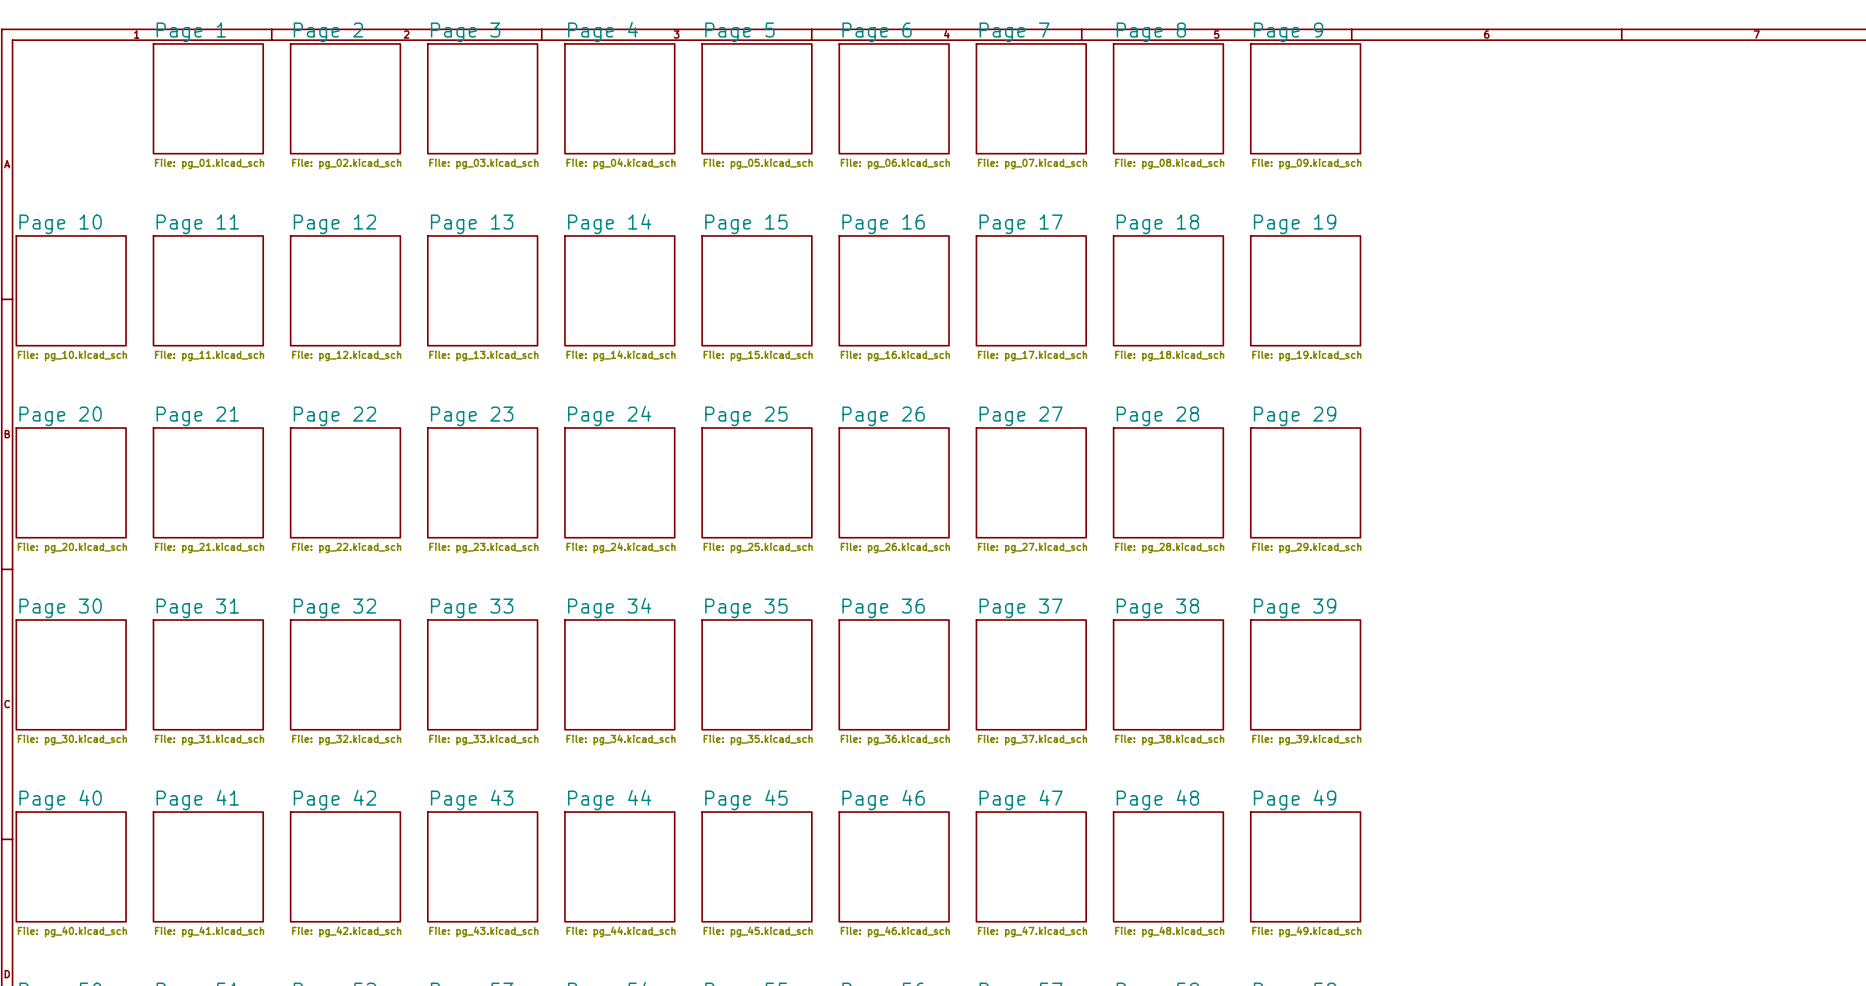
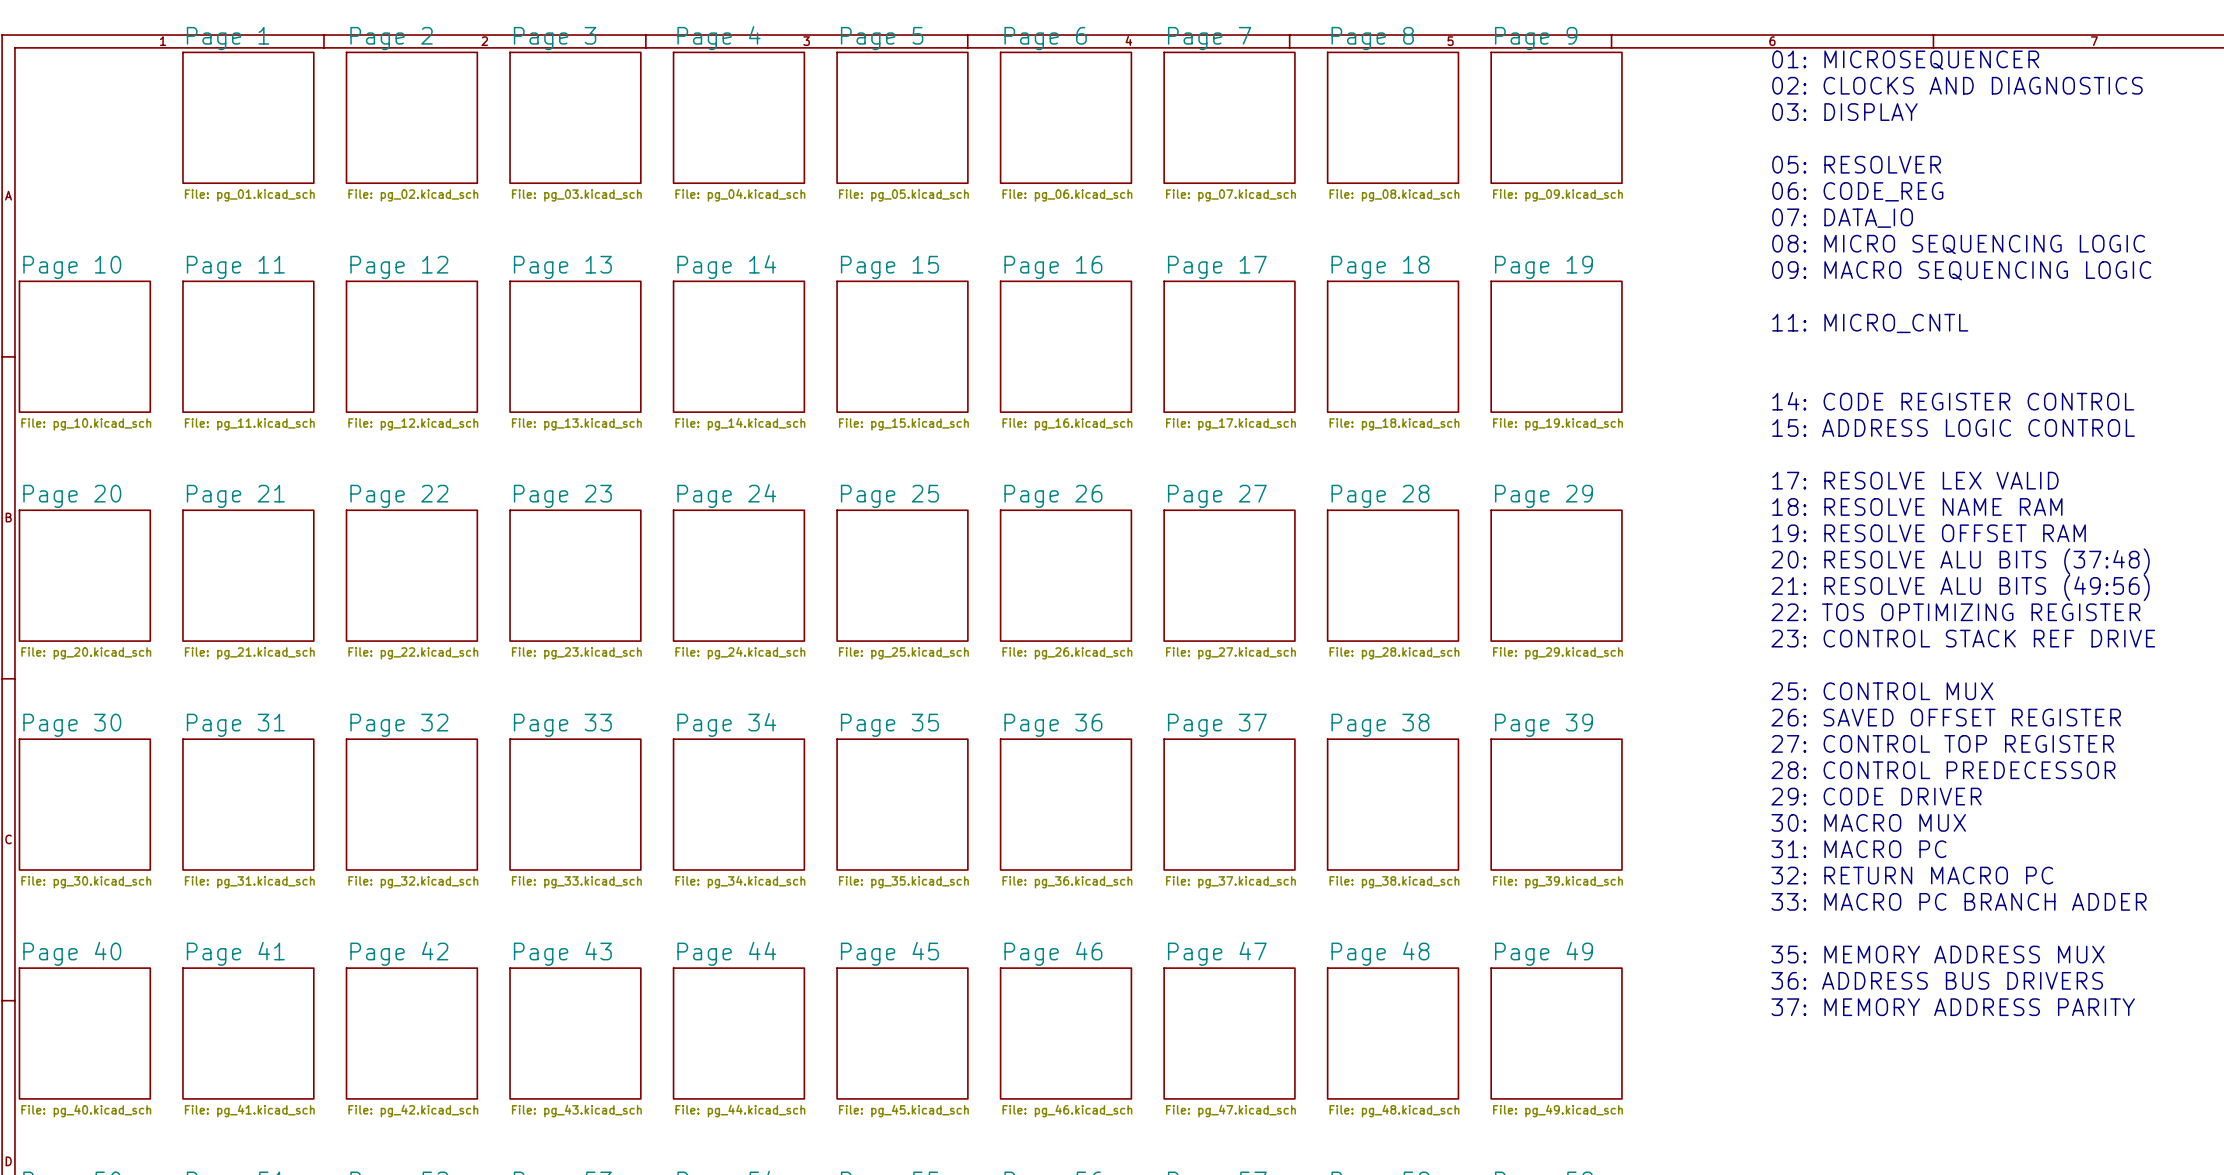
text: none -> 01: MICROSEQUENCER (1905, 60)
text: none -> 02: CLOCKS AND DIAGNOSTICS (1957, 85)
text: none -> 03: DISPLAY (1844, 112)
text: none -> 05: RESOLVER (1856, 164)
text: none -> 06: CODE_REG (1857, 191)
text: none -> 07: DATA_IO (1842, 218)
text: none -> 08: MICRO SEQUENCING LOGIC (1958, 244)
text: none -> 09: MACRO SEQUENCING LOGIC (1961, 270)
text: none -> 11: MICRO_CNTL (1870, 323)
text: none -> 14: CODE REGISTER CONTROL (1953, 401)
text: none -> 15: ADDRESS LOGIC CONTROL (1953, 427)
text: none -> 17: RESOLVE LEX VALID (1915, 480)
text: none -> 18: RESOLVE NAME RAM (1917, 506)
text: none -> 19: RESOLVE OFFSET RAM (1929, 533)
text: none -> 20: RESOLVE ALU BITS (37:48) (1960, 561)
text: none -> 21: RESOLVE ALU BITS (49:56) (1960, 587)
text: none -> 22: TOS OPTIMIZING REGISTER (1955, 612)
text: none -> 23: CONTROL STACK REF DRIVE (1963, 638)
text: none -> 25: CONTROL MUX (1882, 691)
text: none -> 26: SAVED OFFSET REGISTER (1946, 717)
text: none -> 27: CONTROL TOP REGISTER (1942, 743)
text: none -> 28: CONTROL PREDECESSOR (1943, 770)
text: none -> 29: CODE DRIVER (1876, 796)
text: none -> 30: MACRO MUX (1868, 822)
text: none -> 31: MACRO PC (1858, 849)
text: none -> 32: RETURN MACRO PC (1912, 875)
text: none -> 33: MACRO PC BRANCH ADDER (1959, 901)
text: none -> 35: MEMORY ADDRESS MUX (1937, 954)
text: none -> 36: ADDRESS BUS DRIVERS (1937, 980)
text: none -> 37: MEMORY ADDRESS PARITY (1953, 1007)

